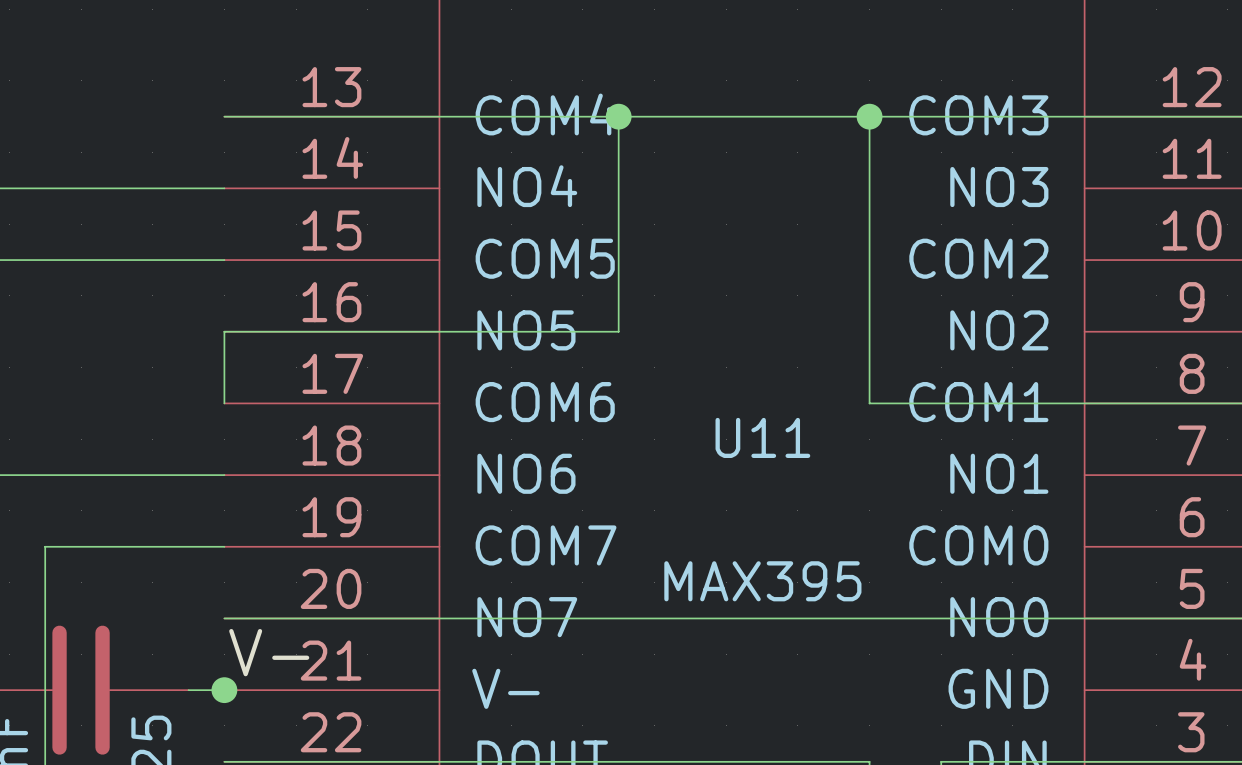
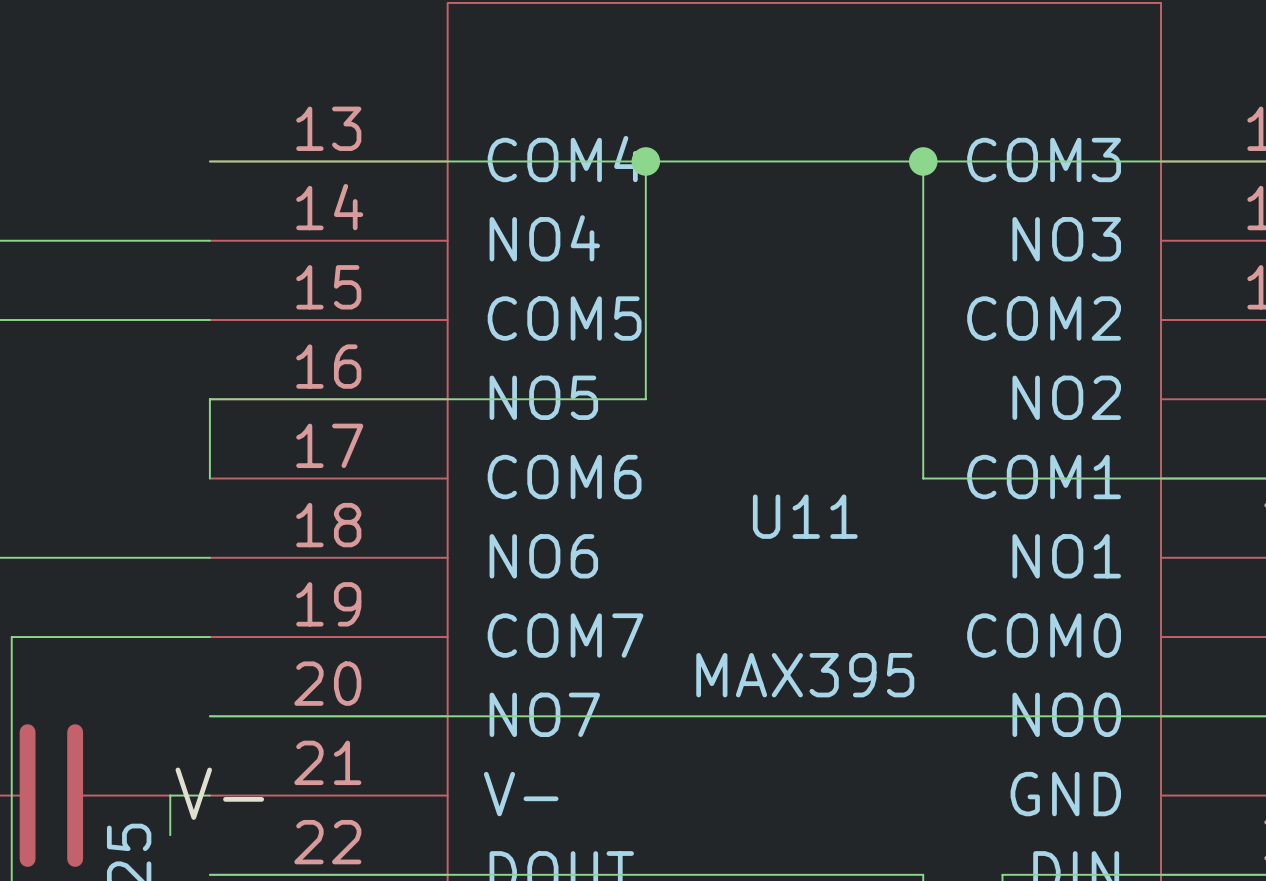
label position: V- (269, 652) -> V- (219, 793)
wire: none -> (170, 795) (170, 835)
junction: (224, 690) -> none

